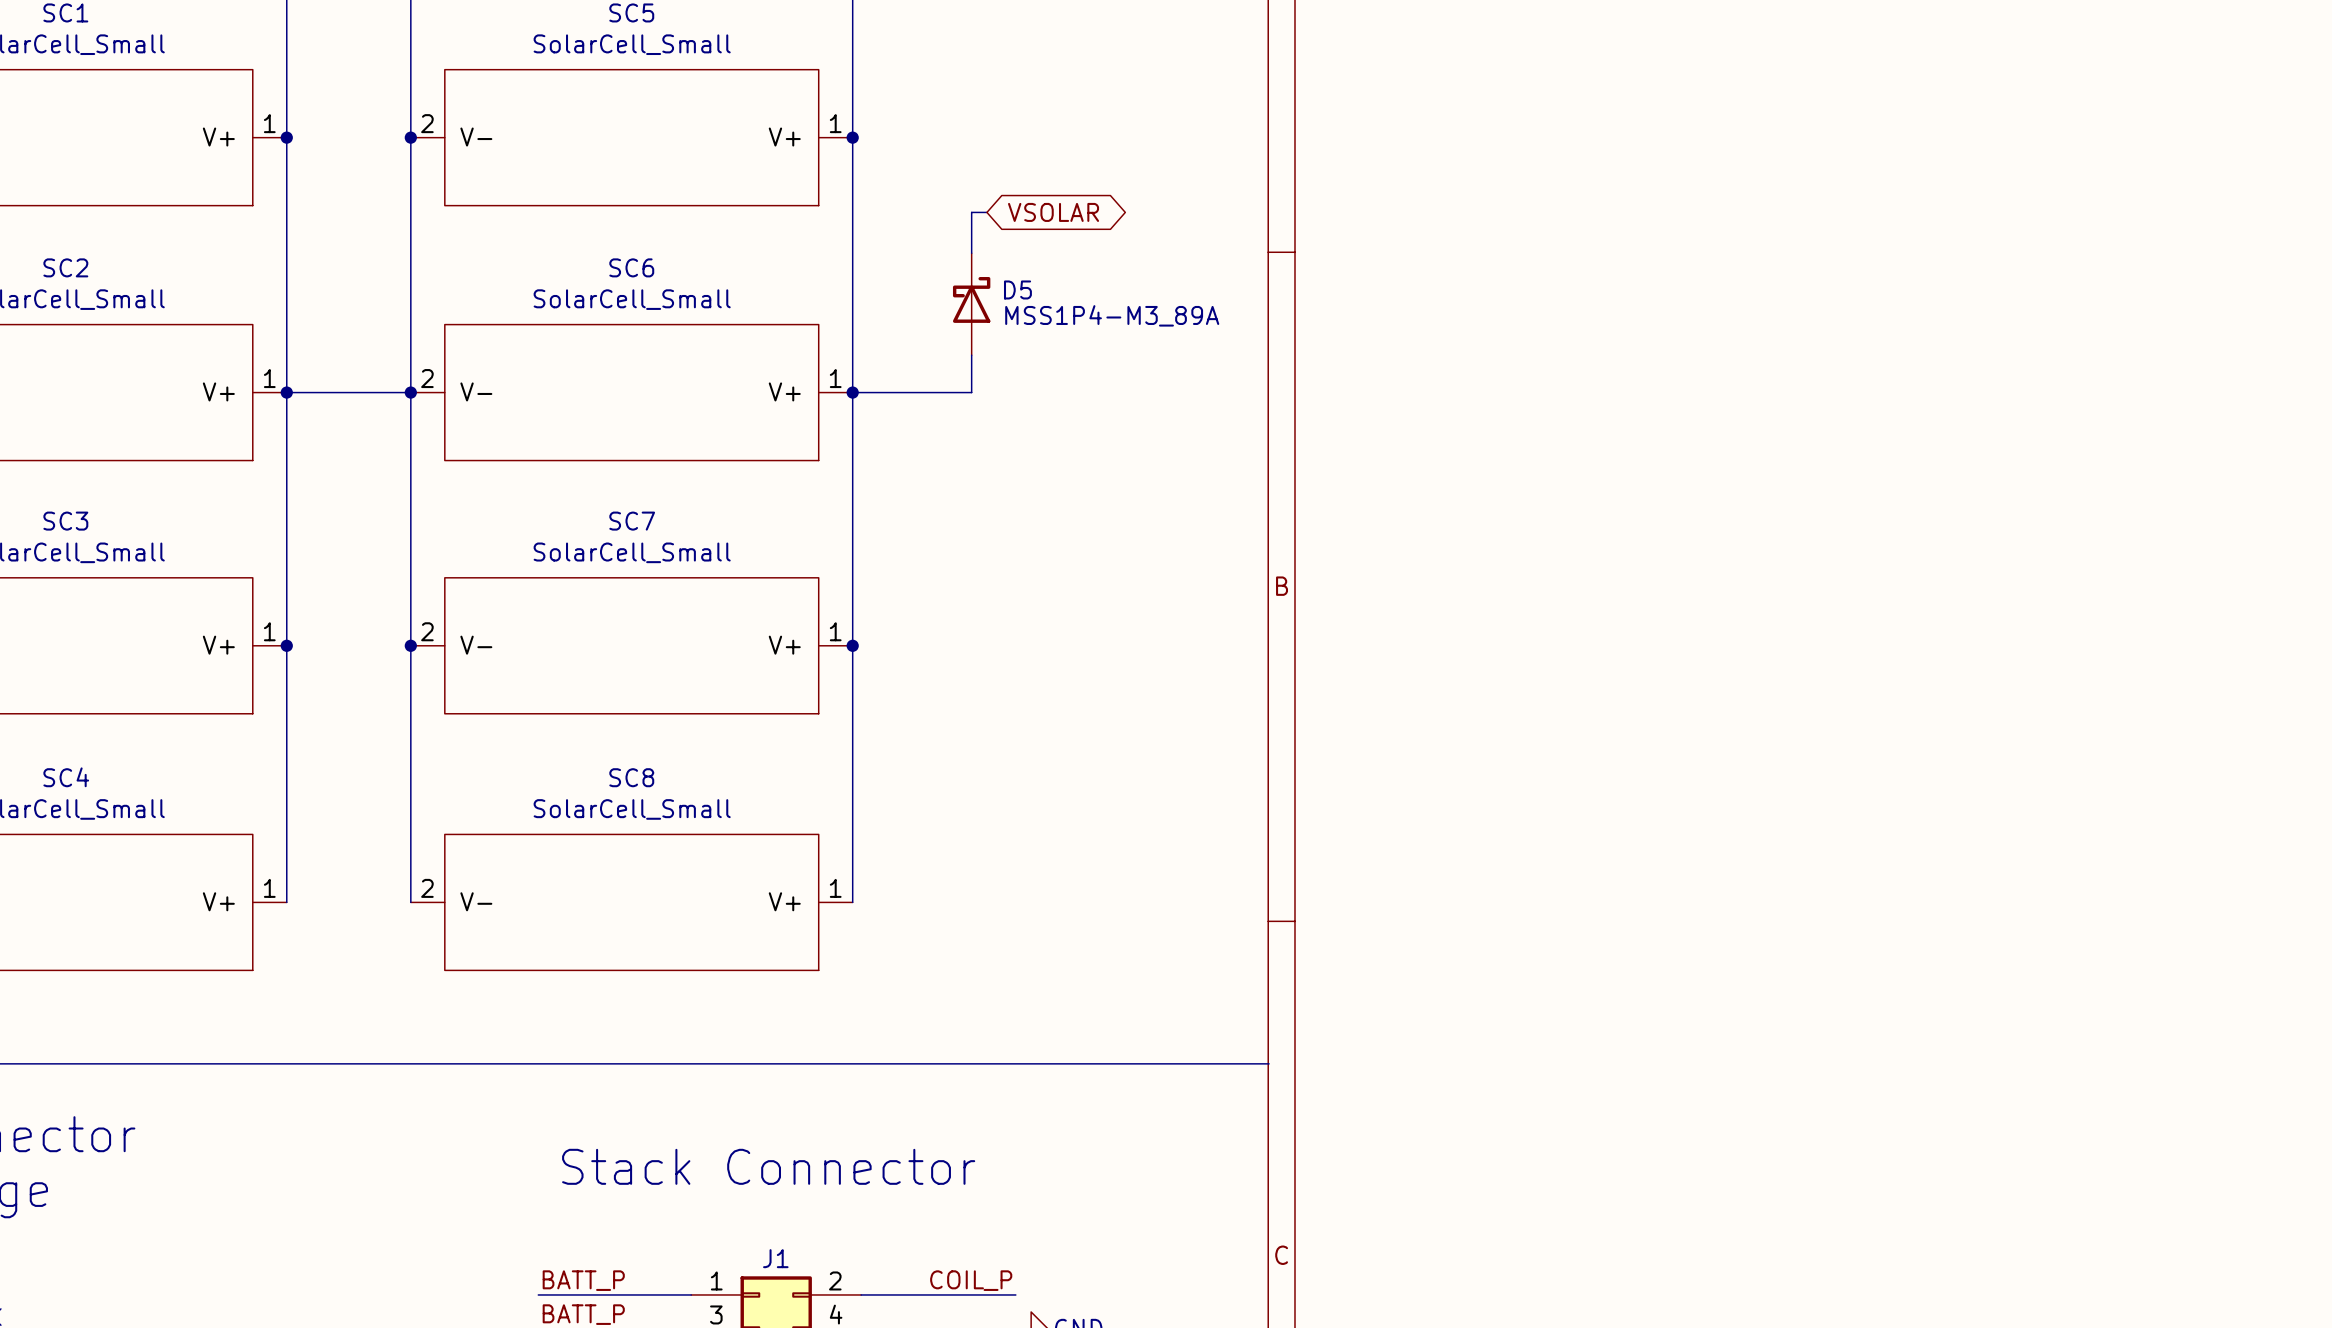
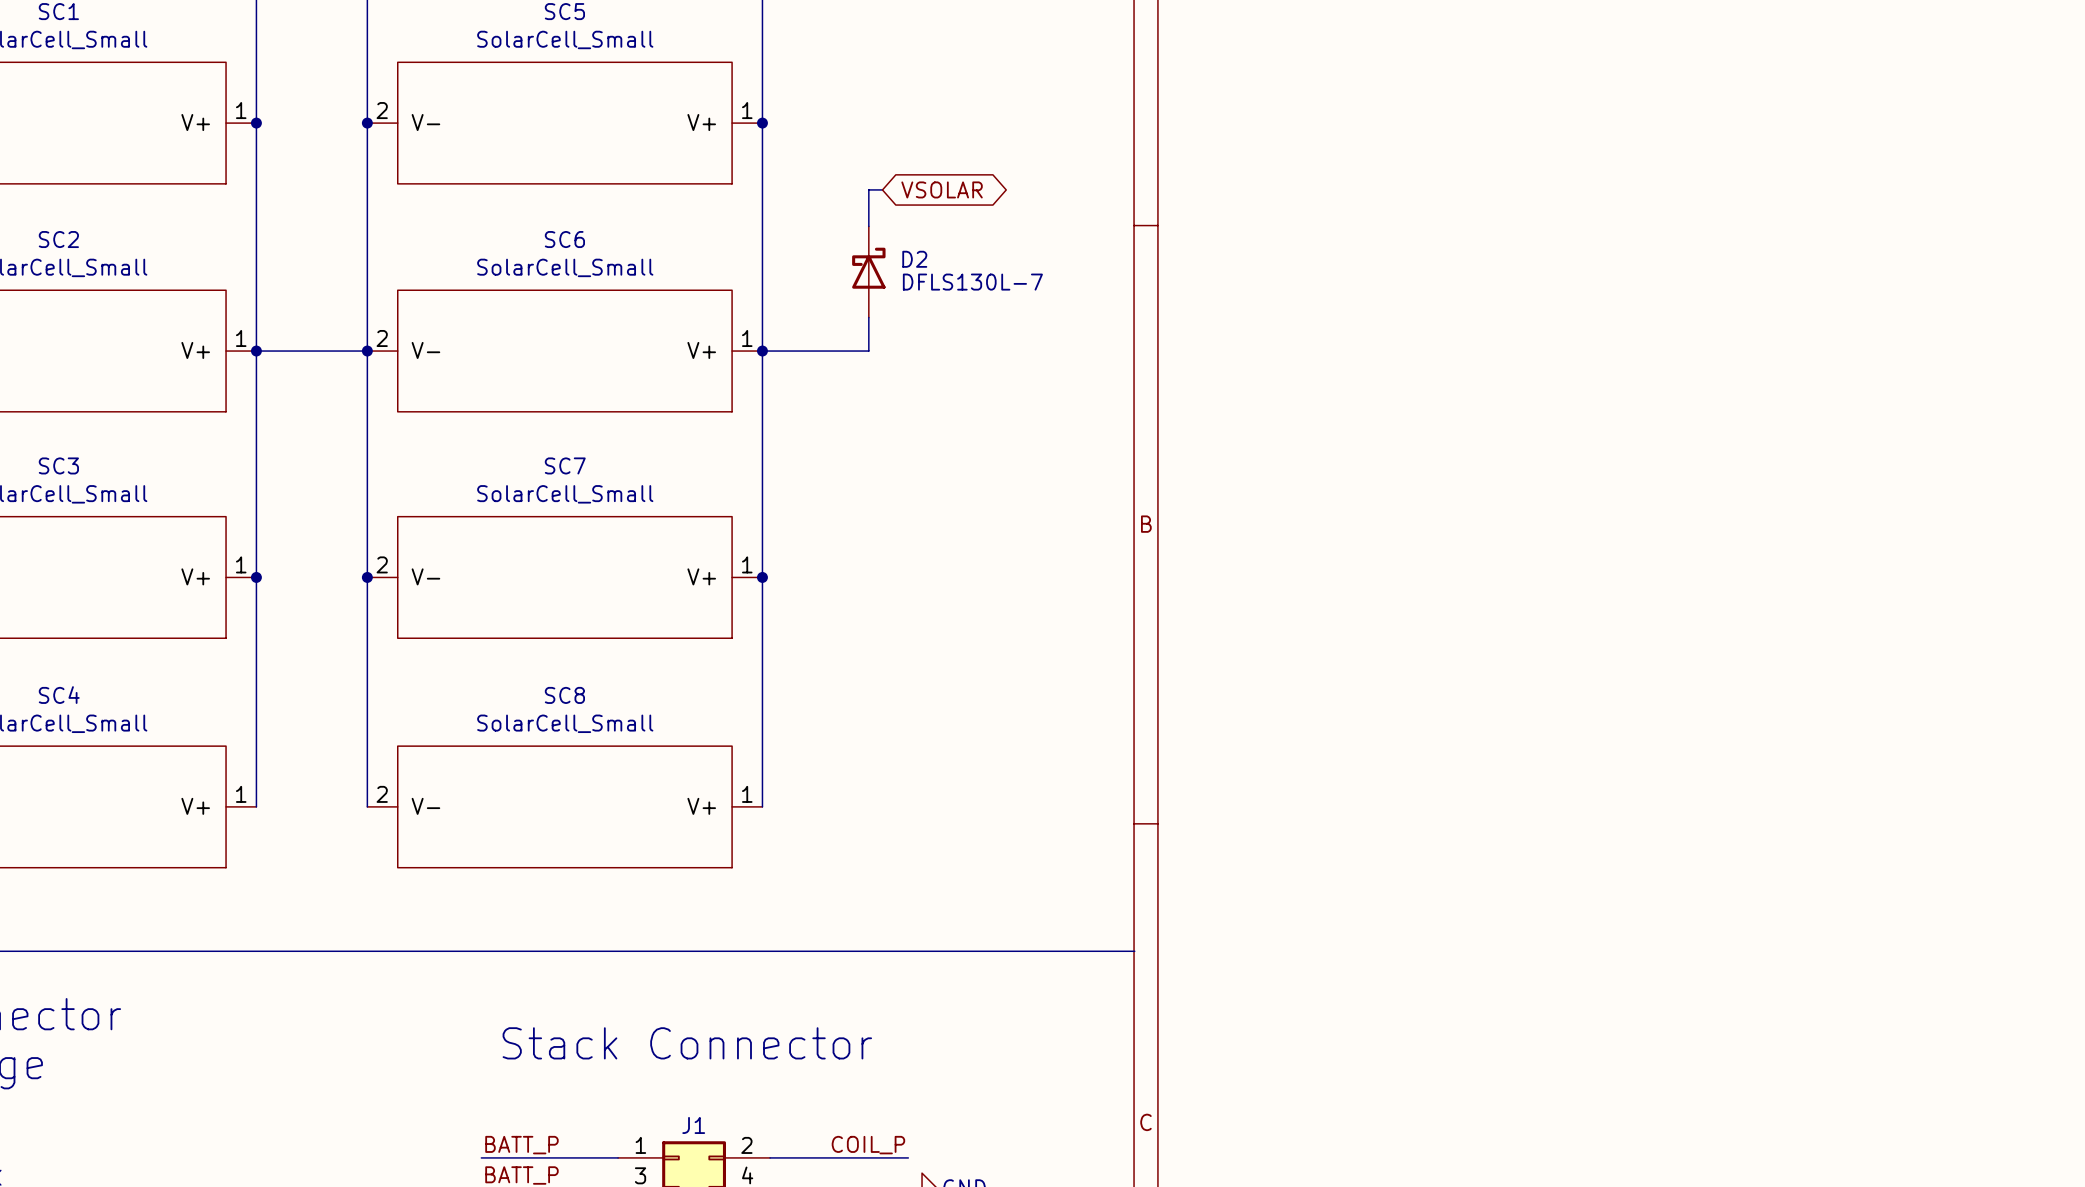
D5 name: D5 (1017, 289) -> D2 (914, 259)
D5 value: MSS1P4-M3_89A (1112, 315) -> DFLS130L-7 (972, 282)

